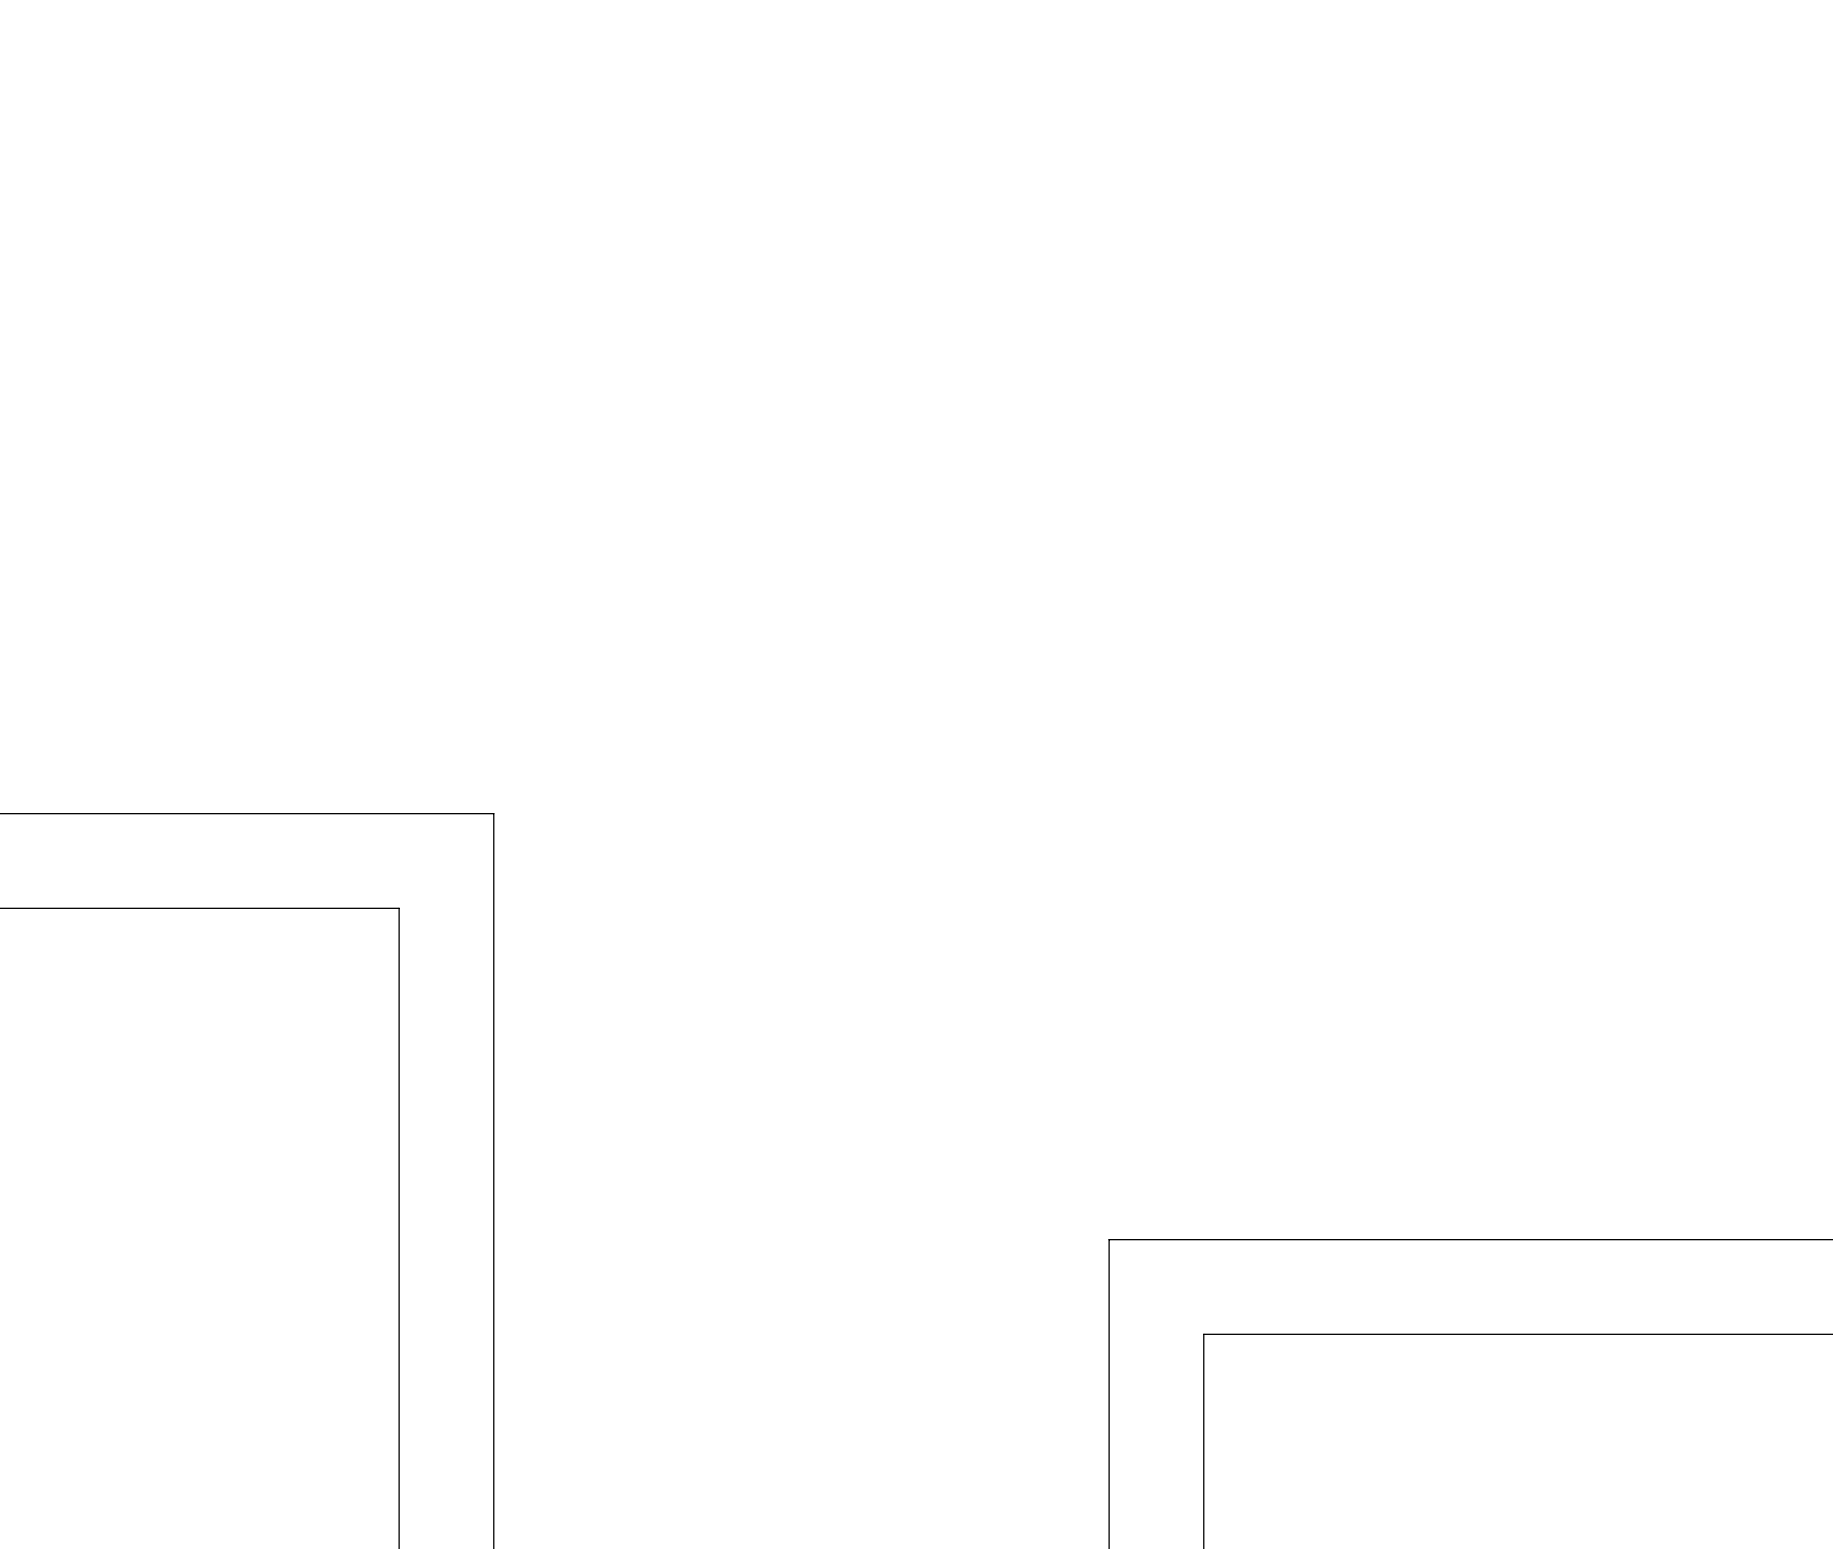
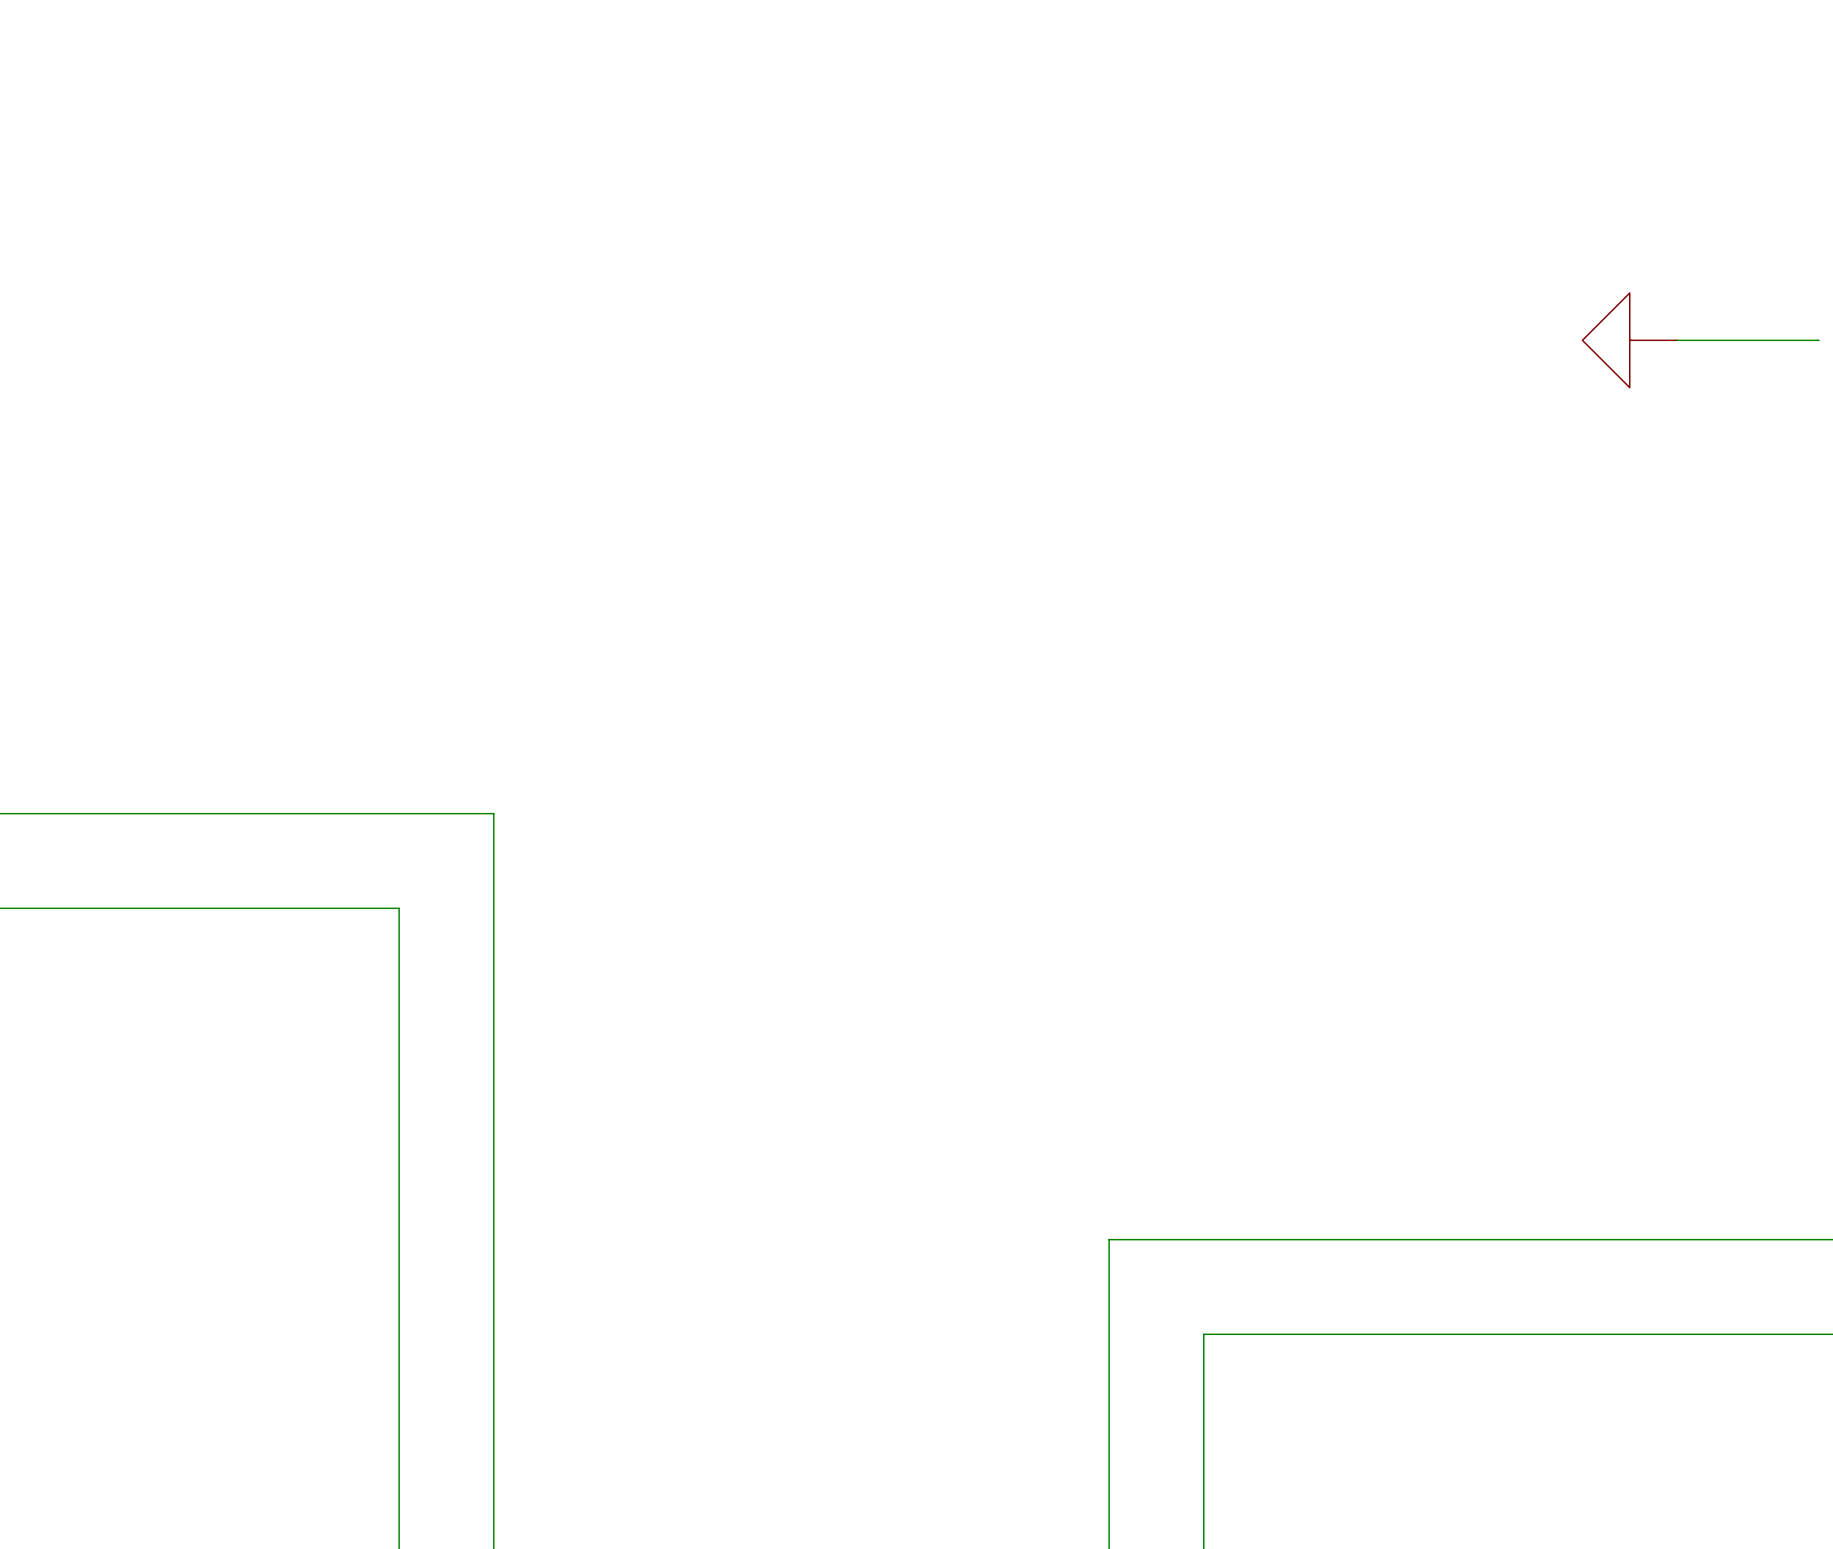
power symbol: none -> (1629, 340)
wire: none -> (1677, 340) (1819, 340)

